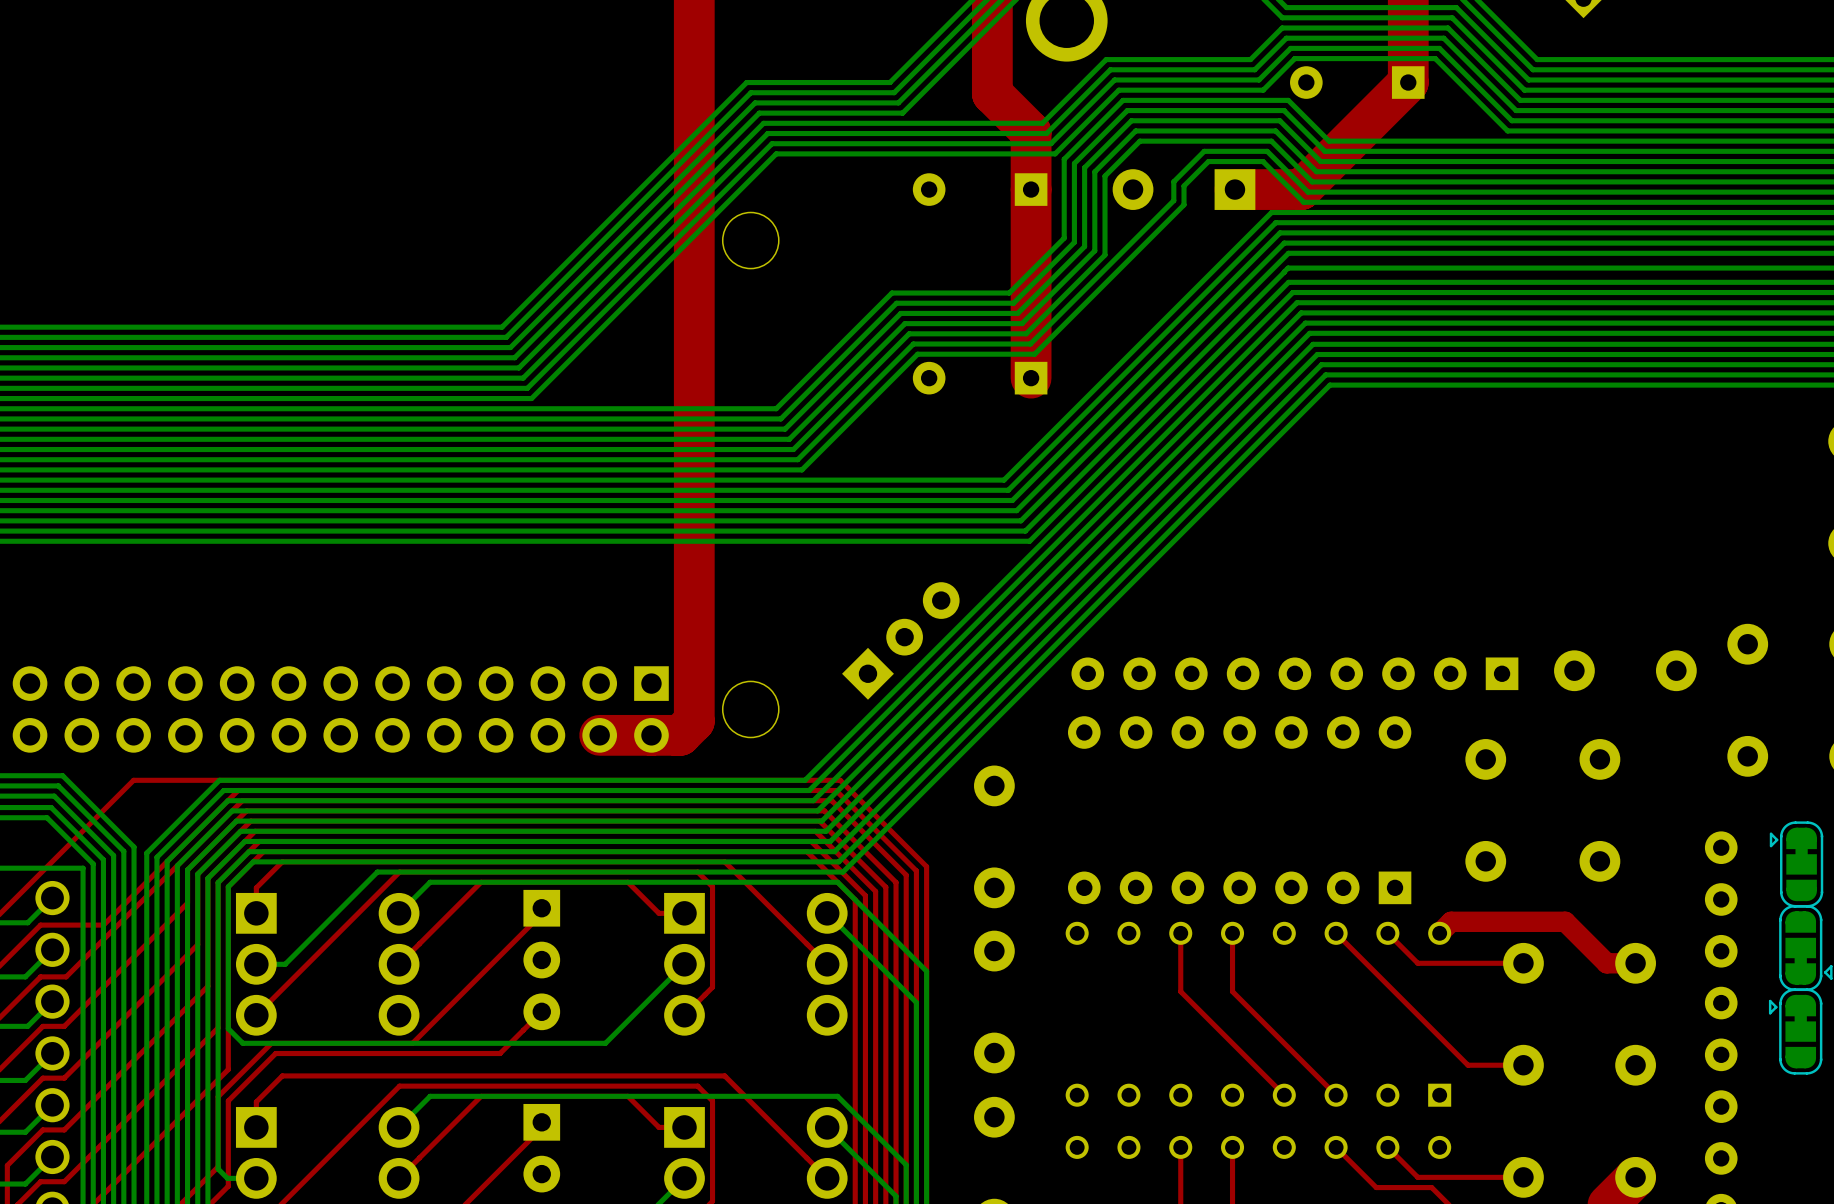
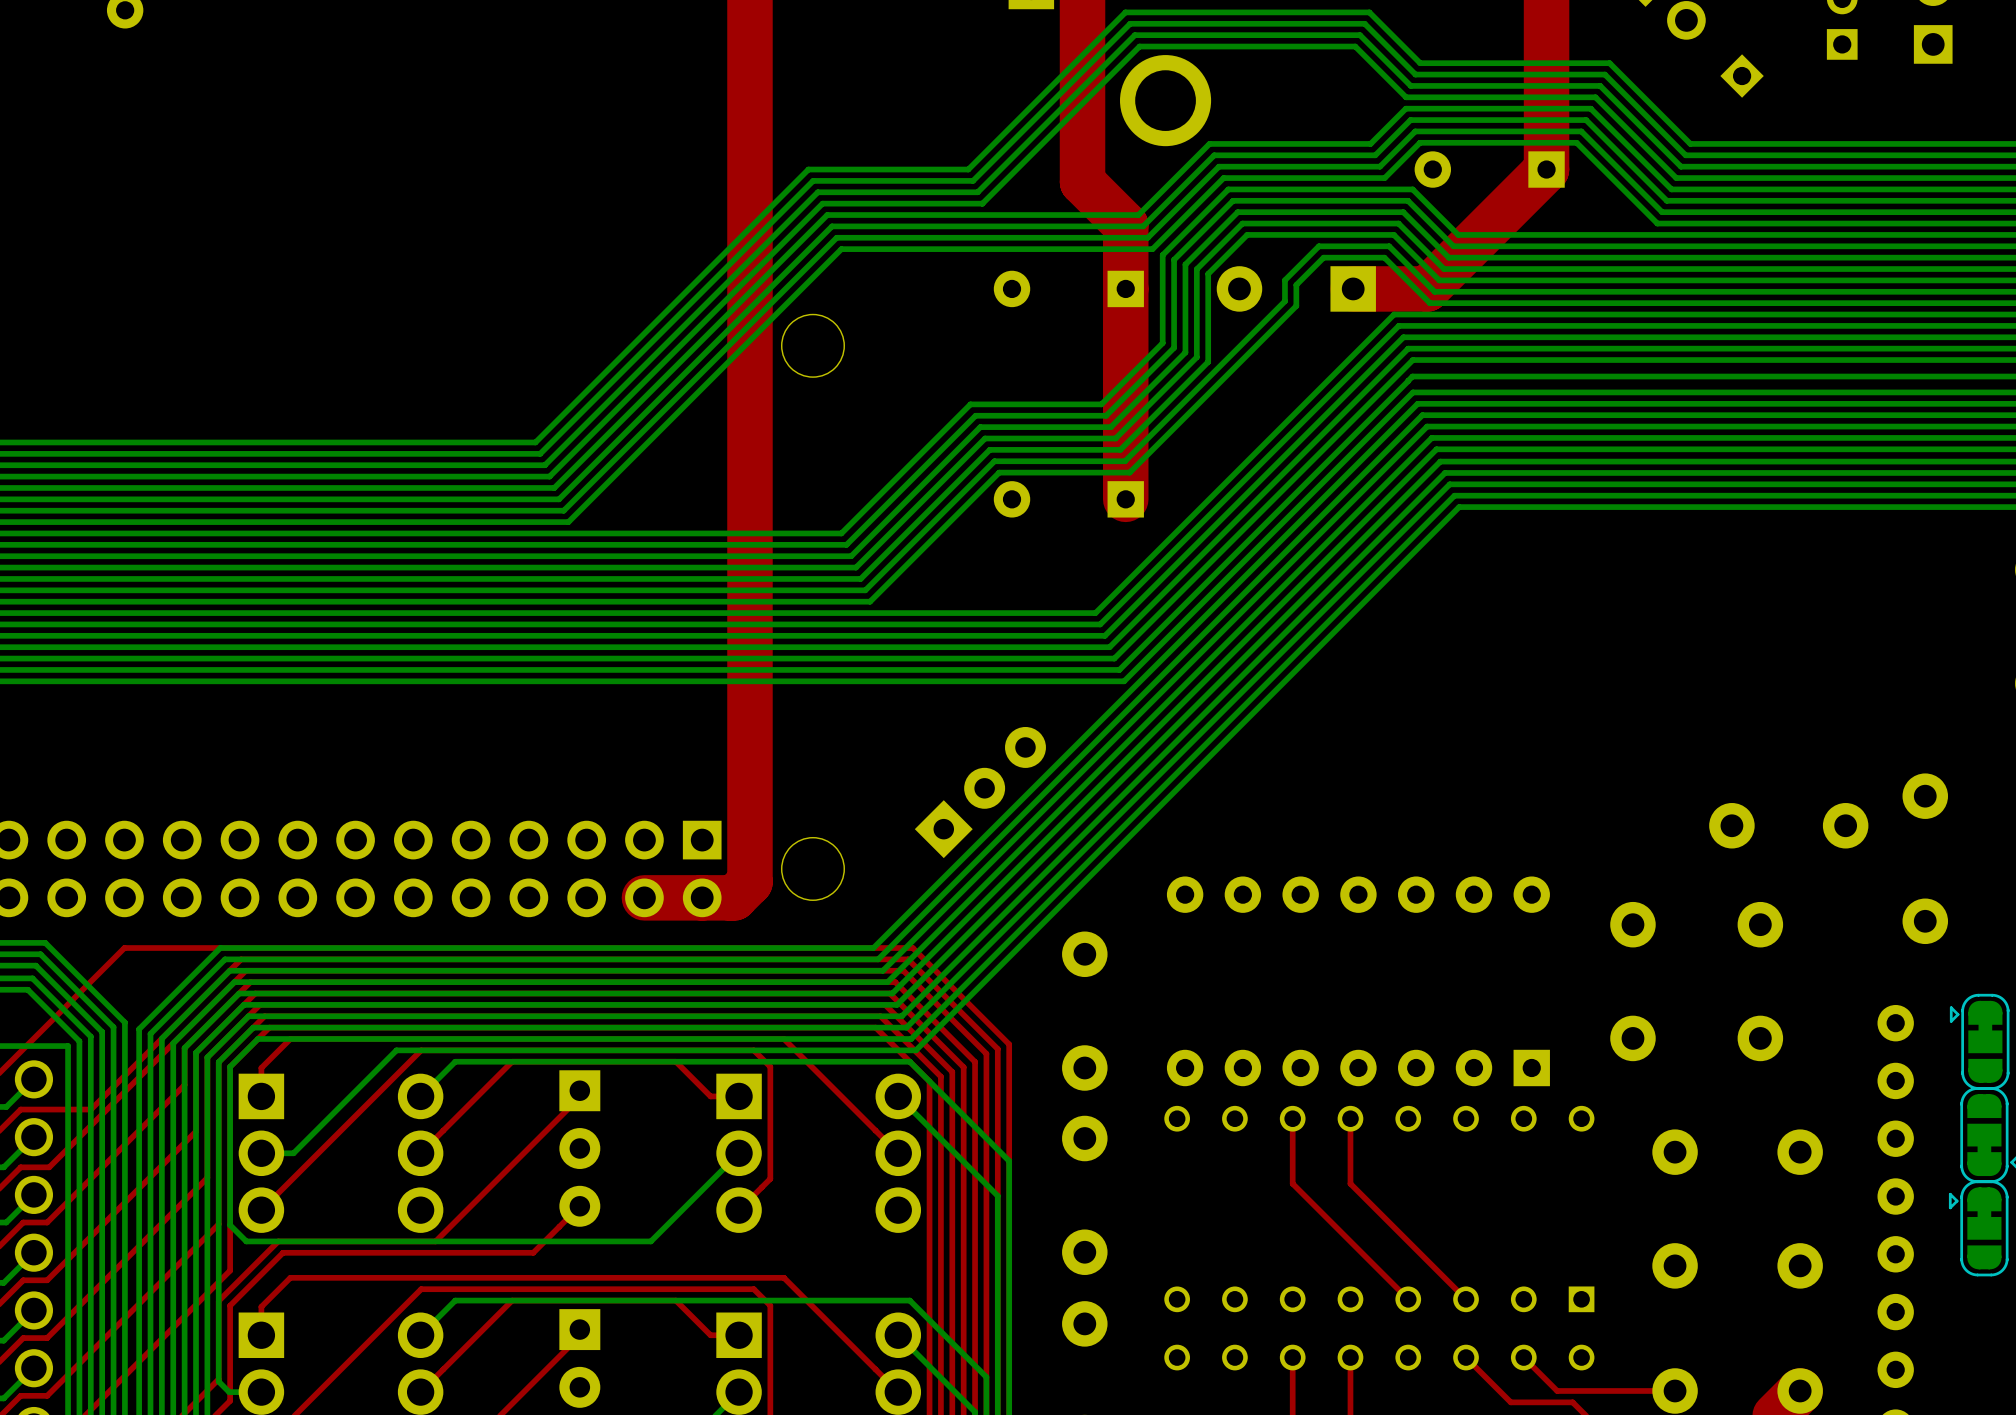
part: (1294, 673) -> none
top track: (1336, 933) (1468, 1065) (1523, 1065) -> none
top track: (1387, 933) (1417, 963) (1523, 963) -> none
top track: (1439, 933) (1451, 921) (1565, 921) (1606, 963) (1635, 963) -> none

